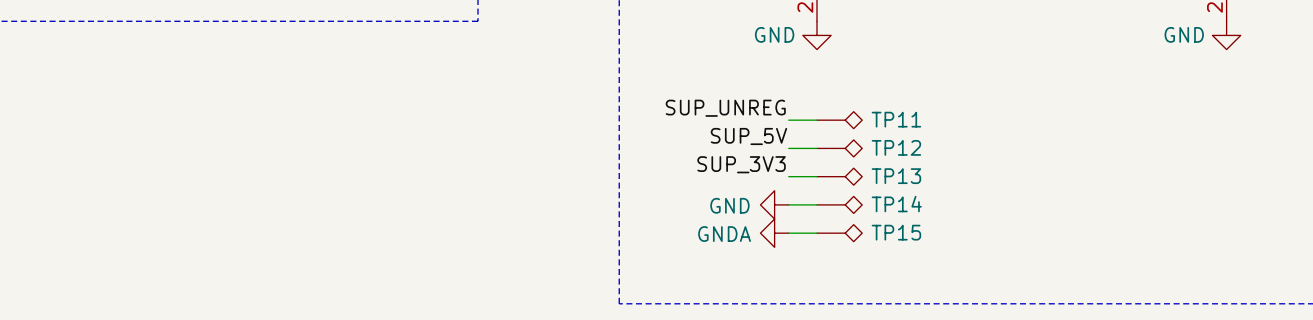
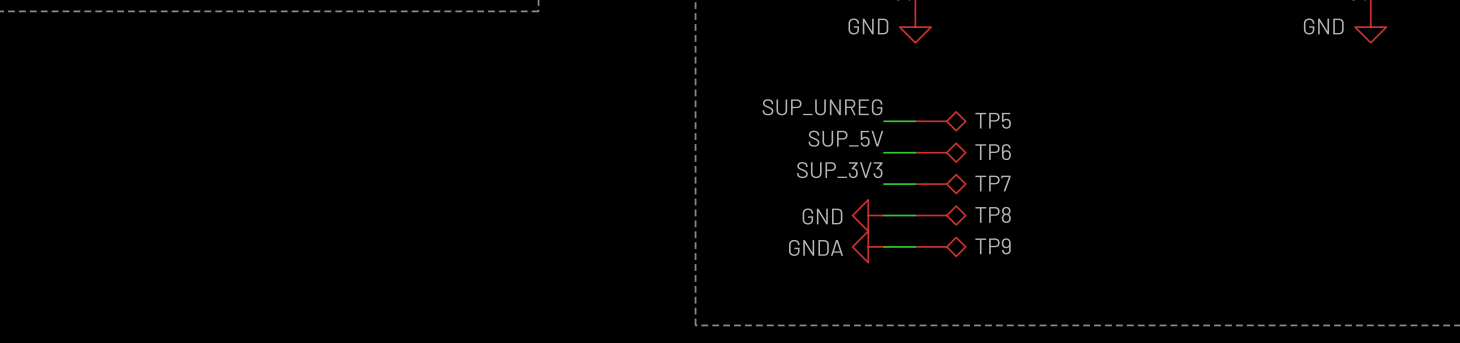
TP11 name: TP11 (896, 119) -> TP5 (993, 120)
TP12 name: TP12 (896, 147) -> TP6 (993, 152)
TP13 name: TP13 (896, 176) -> TP7 (992, 183)
TP14 name: TP14 (896, 204) -> TP8 (993, 214)
TP15 name: TP15 (896, 232) -> TP9 (993, 246)

